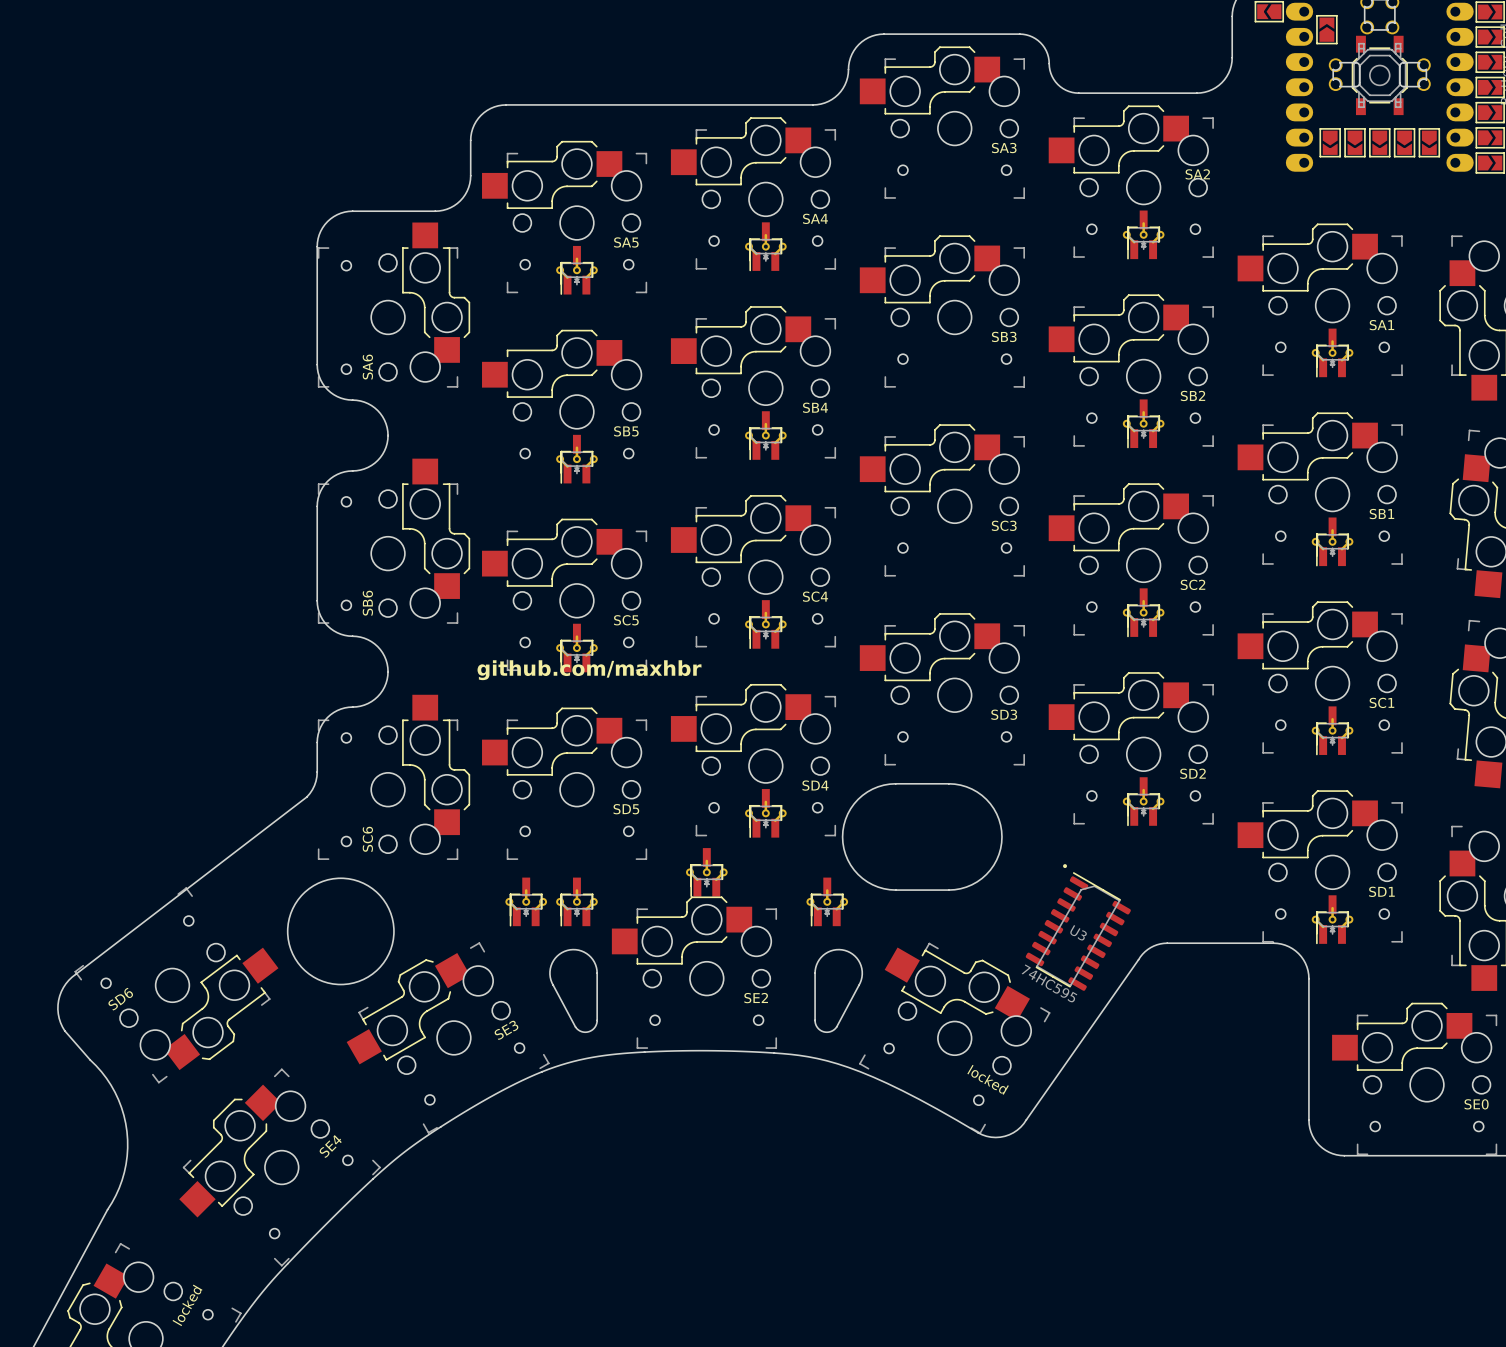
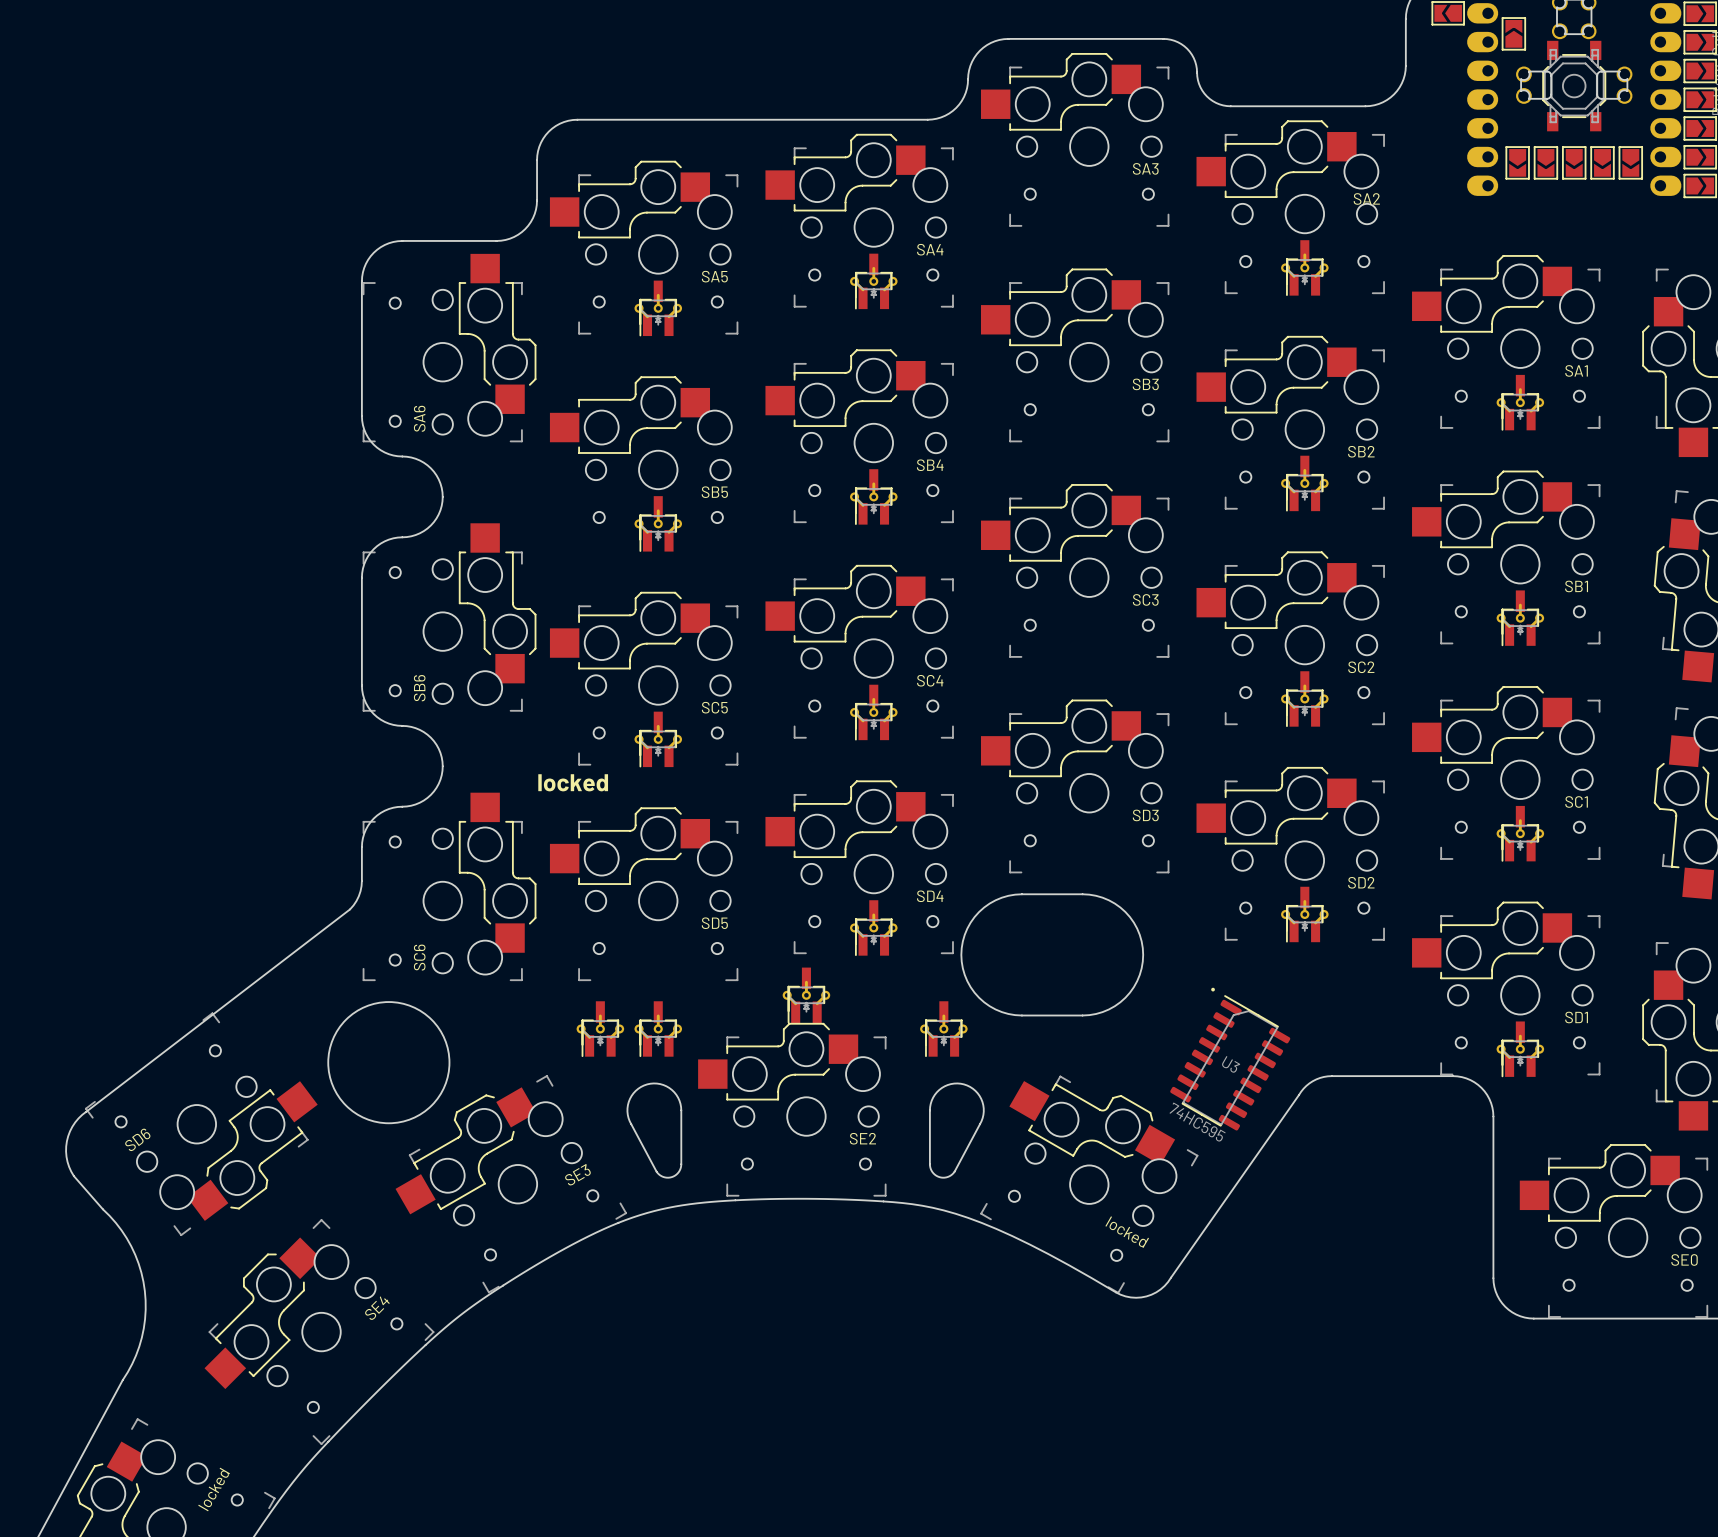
text: github.com/maxhbr (589, 670) -> none
text: none -> locked (573, 782)

